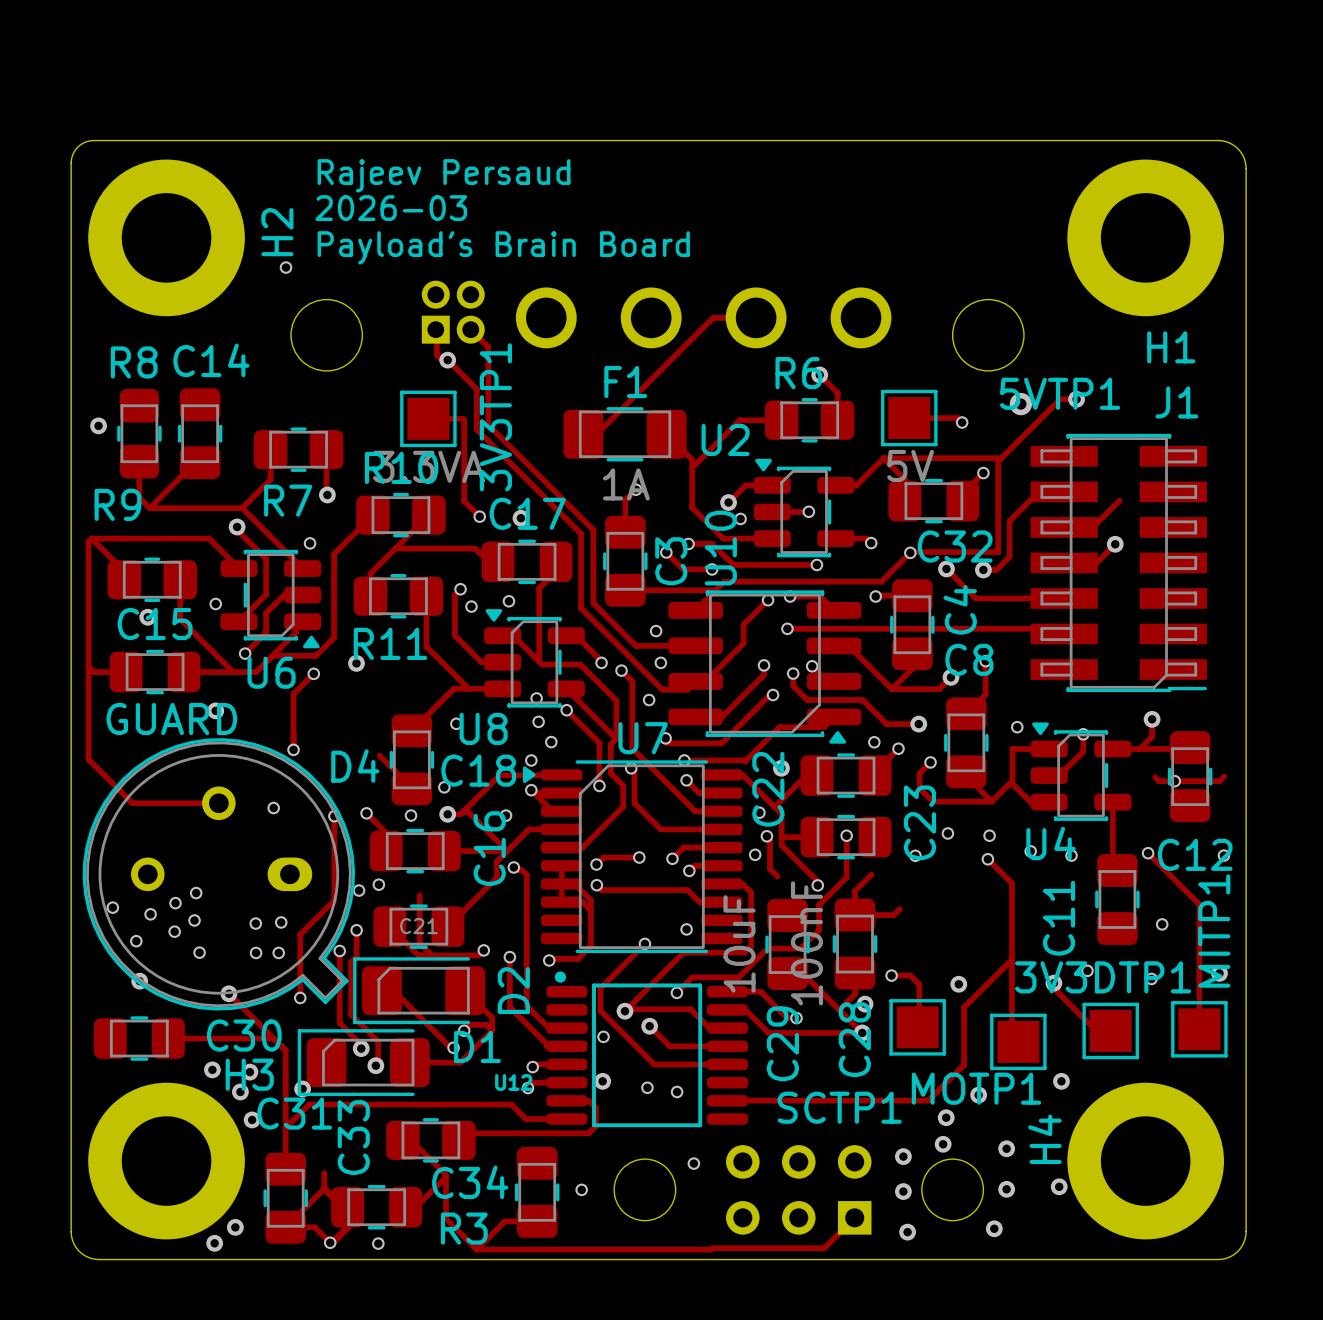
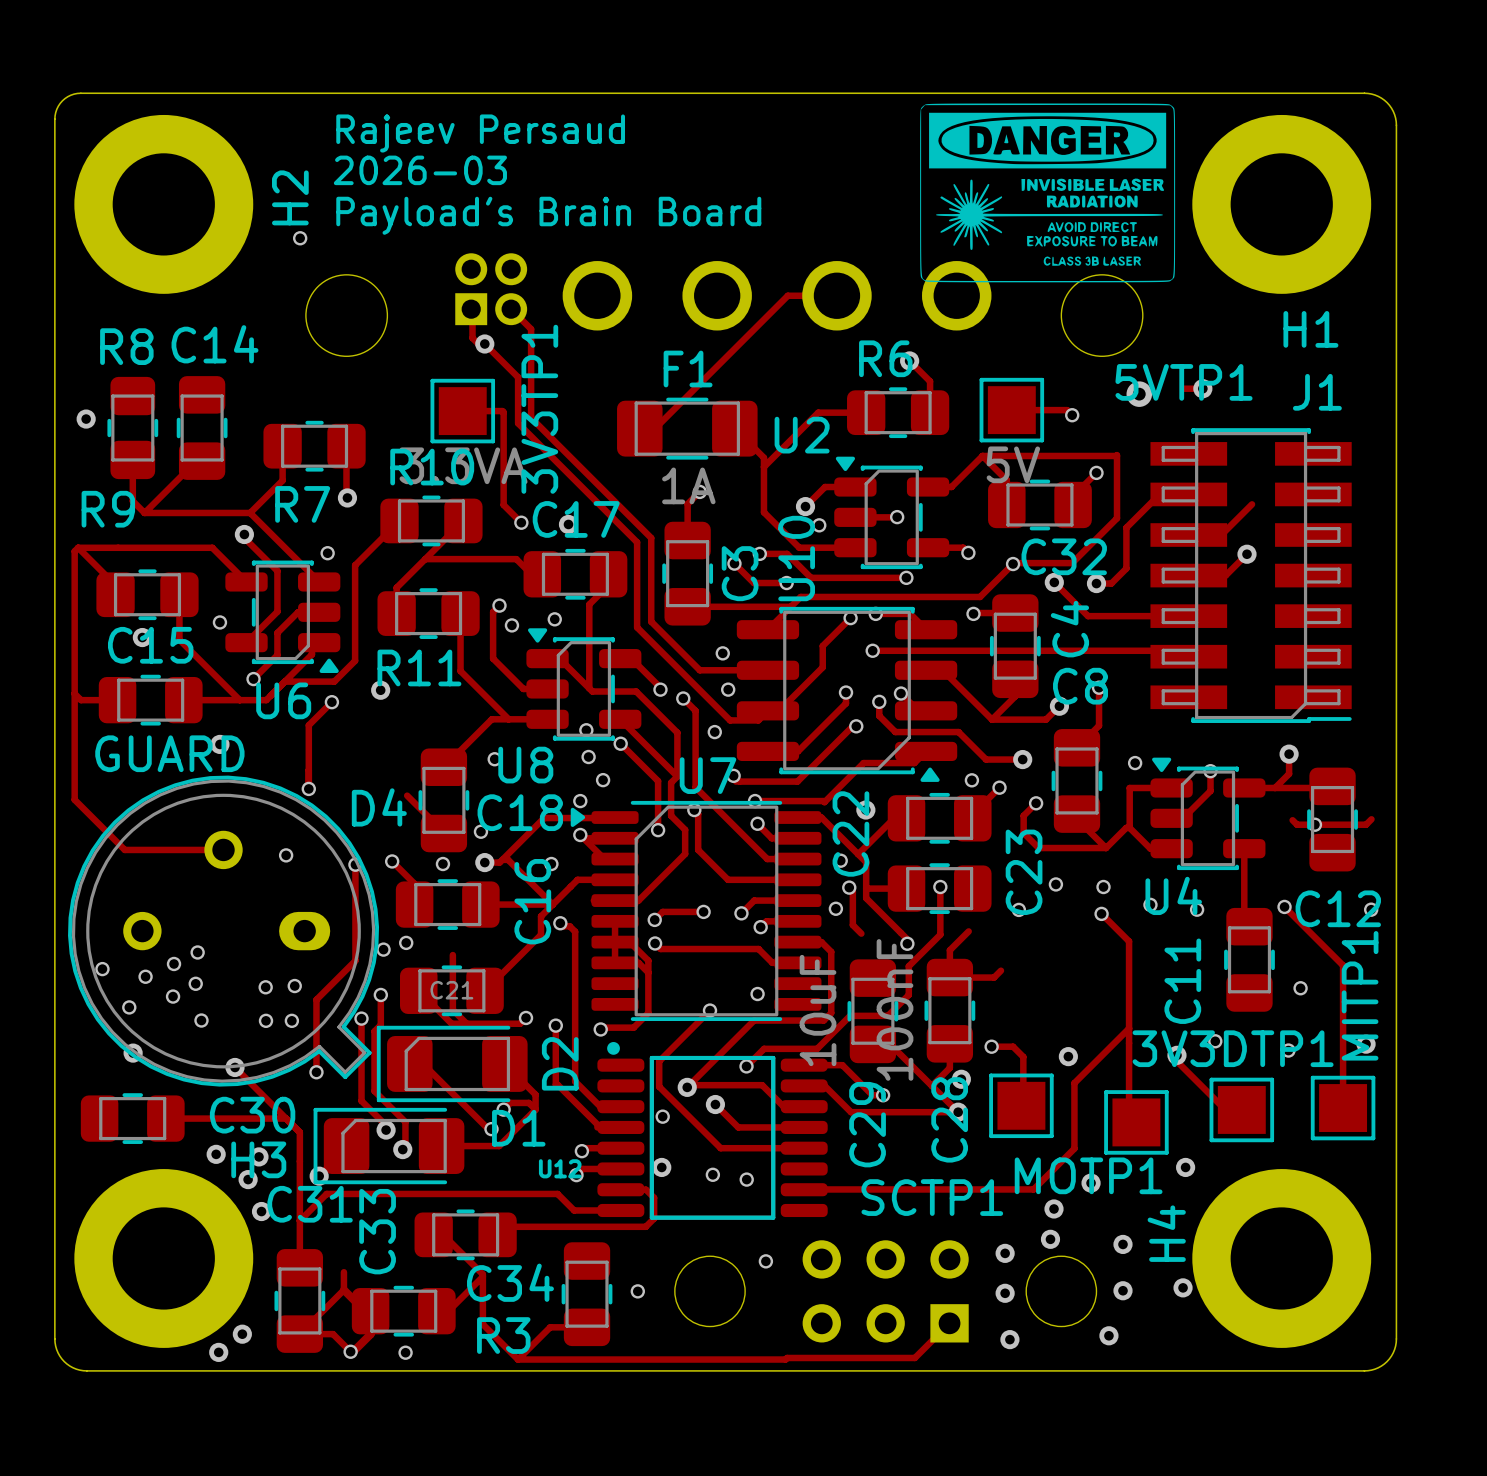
drawing: none -> [920, 103, 1176, 283]
track: (1060, 399) (998, 461) (998, 552) (962, 552) -> (1117, 455) (1117, 518) (1072, 563)

